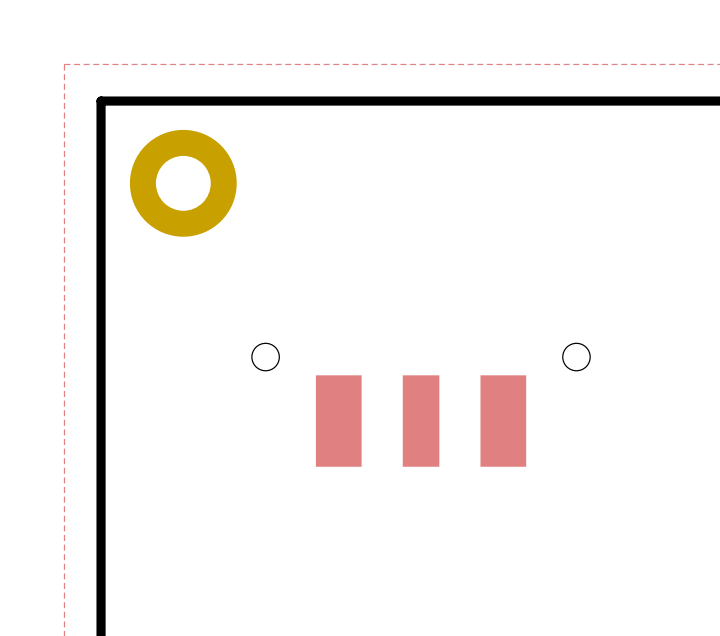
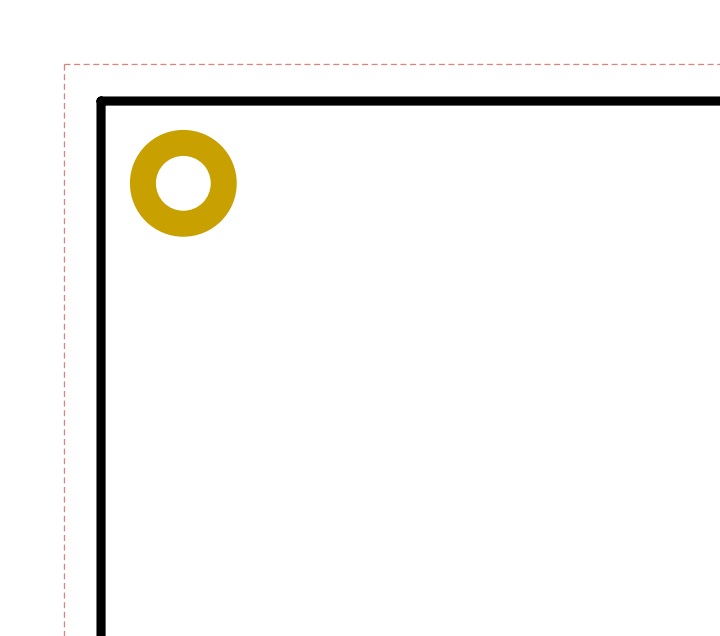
part: (421, 405) -> none

